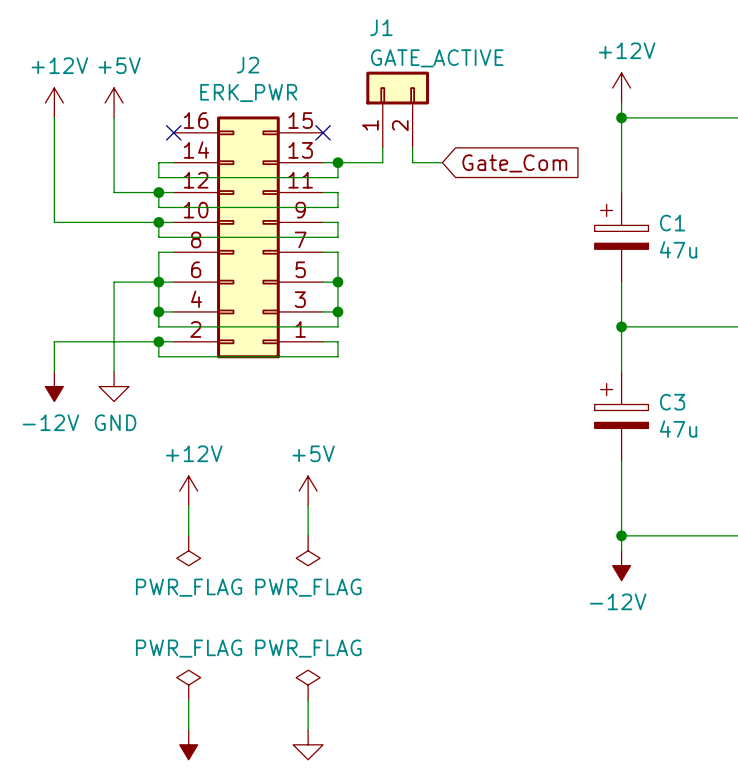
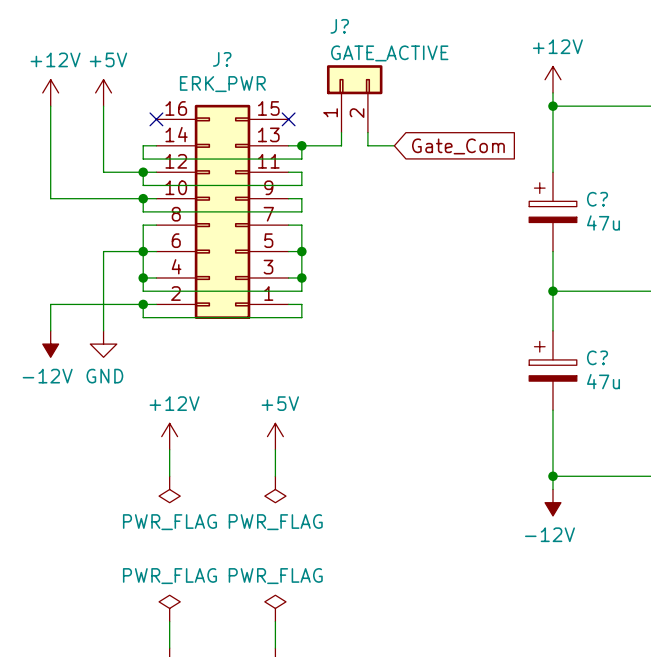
J1 name: J1 (381, 27) -> J? (339, 26)
J2 name: J2 (248, 65) -> J? (222, 59)
C1 name: C1 (672, 223) -> C? (597, 199)
C3 name: C3 (672, 402) -> C? (597, 357)

